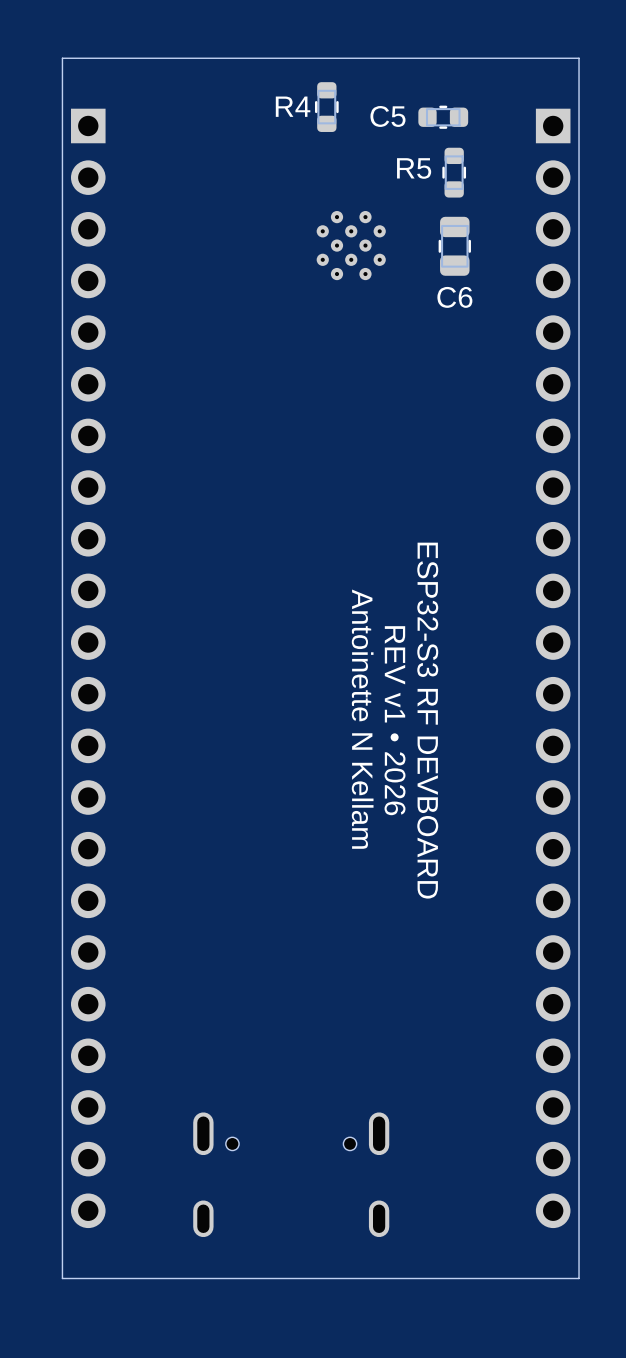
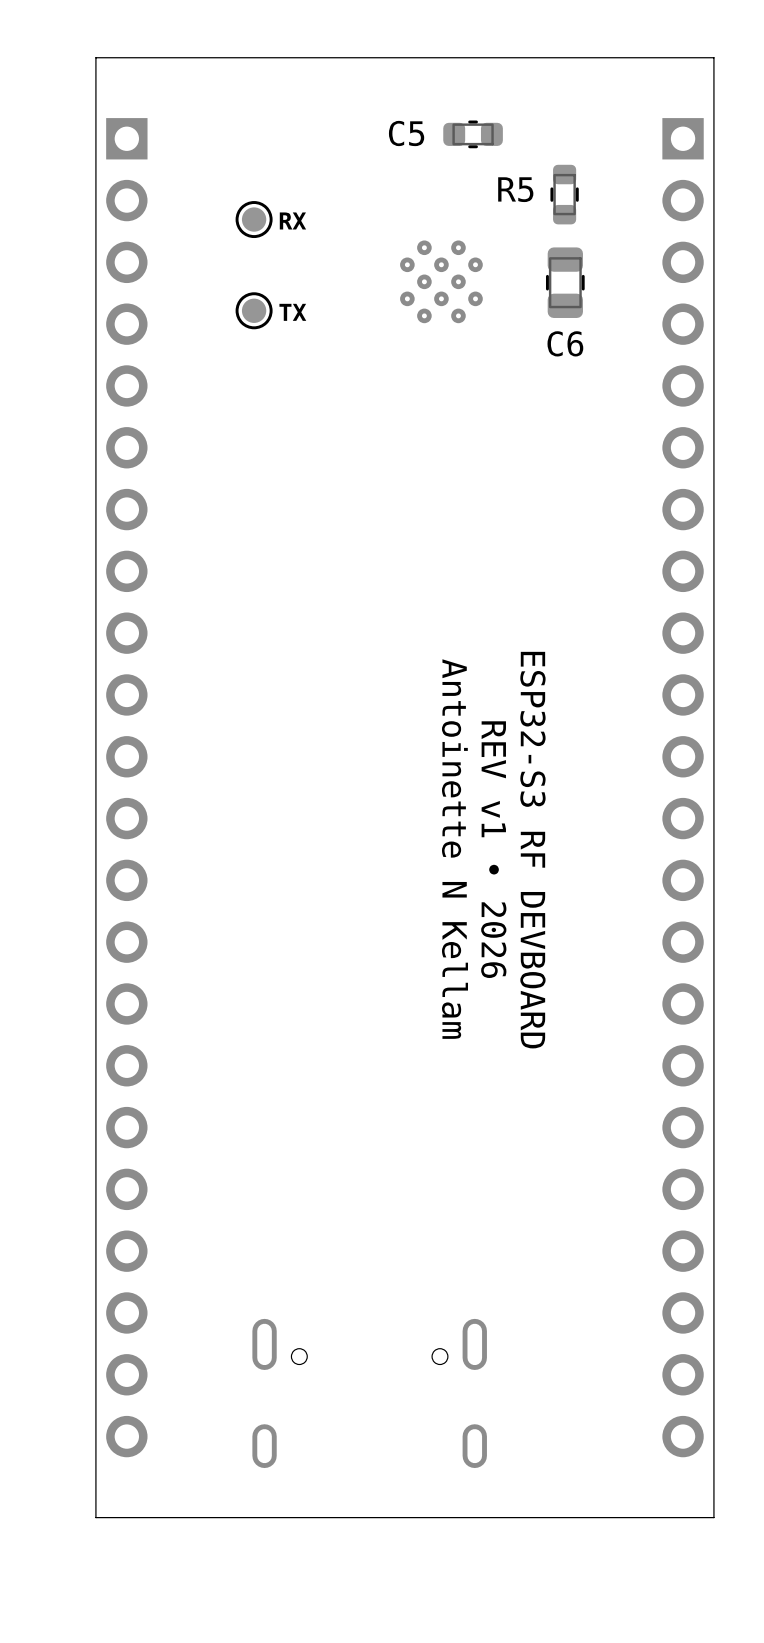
R4: (326, 107) -> none
C5 position: (443, 117) -> (473, 134)
part: none -> (254, 219)
text: none -> RX (292, 220)
part: none -> (254, 310)
text: none -> TX (292, 312)

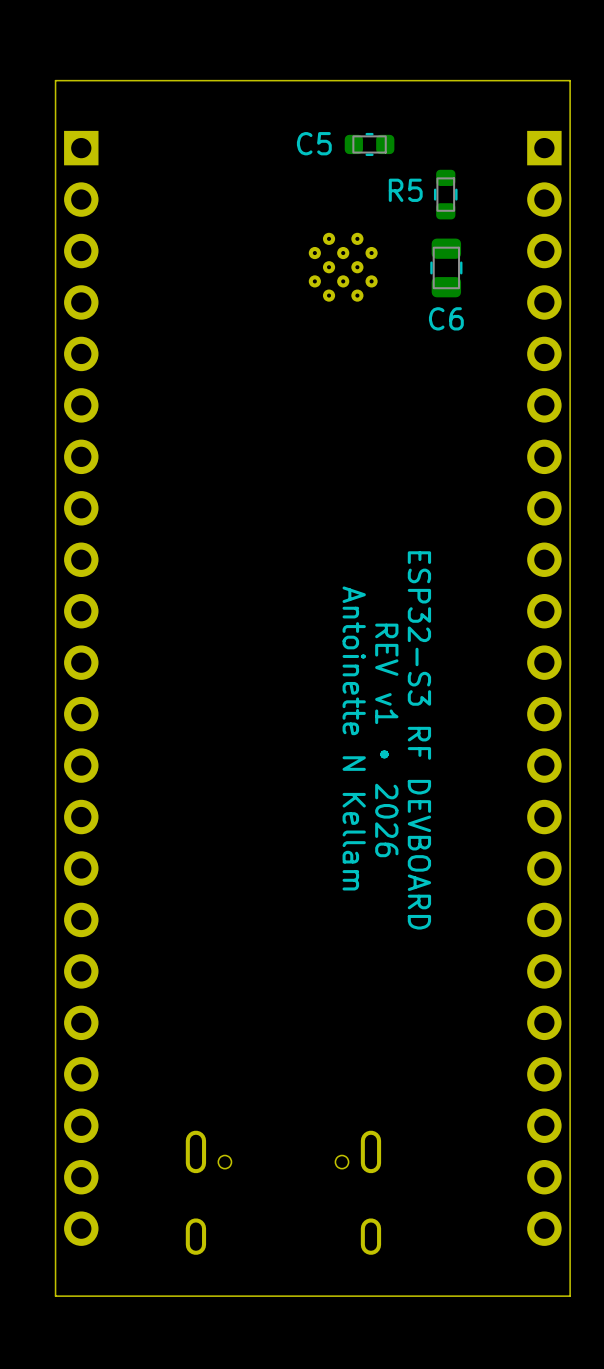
part: (254, 219) -> none
text: RX (292, 220) -> none
part: (254, 310) -> none
text: TX (292, 312) -> none

